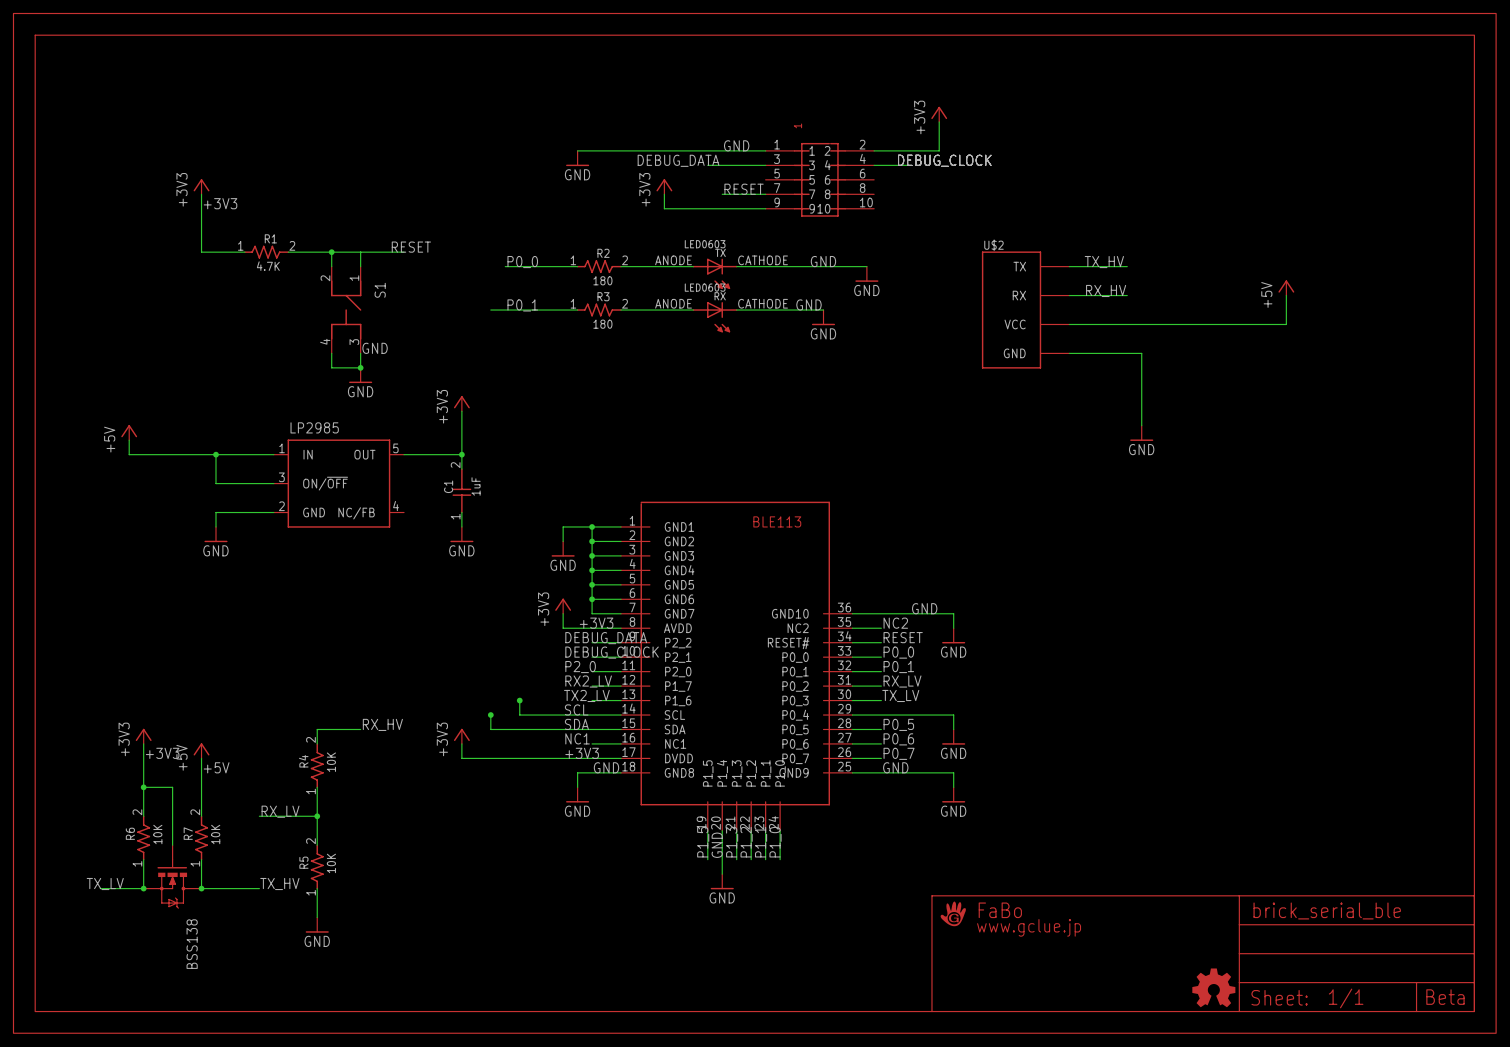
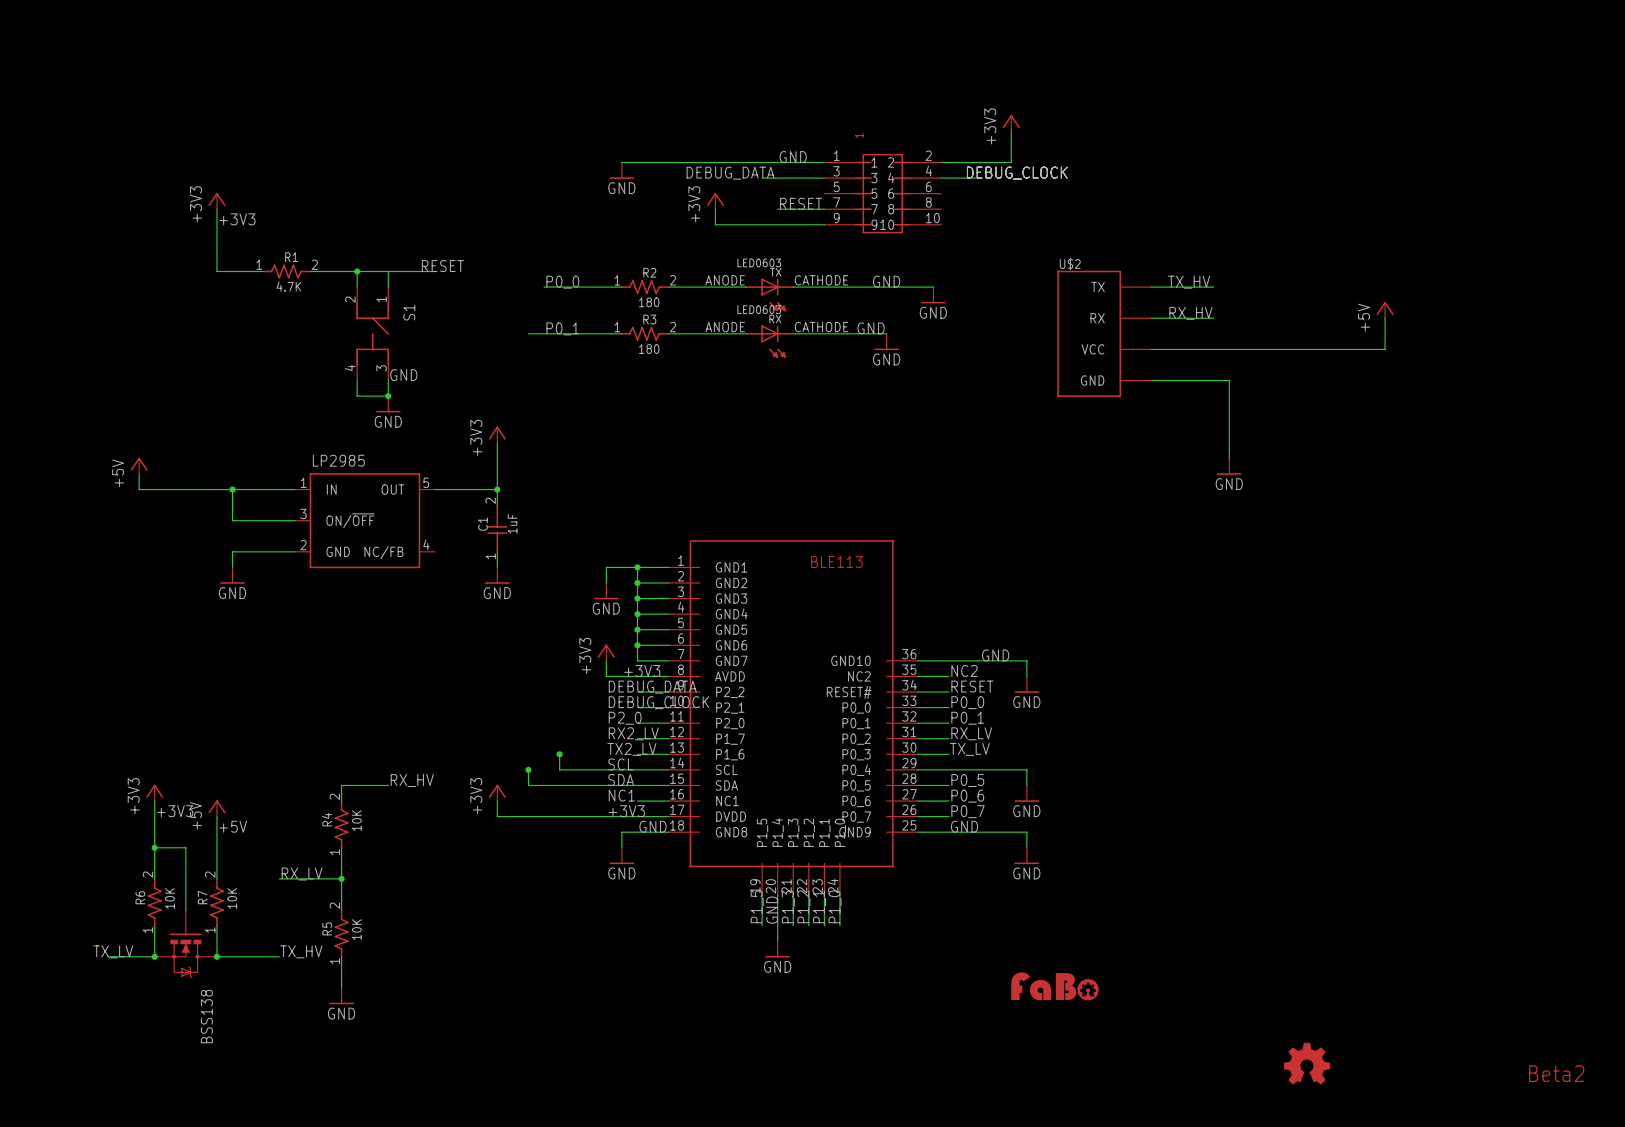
part: (754, 523) -> none
part: none -> (1054, 986)
text: Beta (1445, 997) -> Beta2 (1556, 1073)

